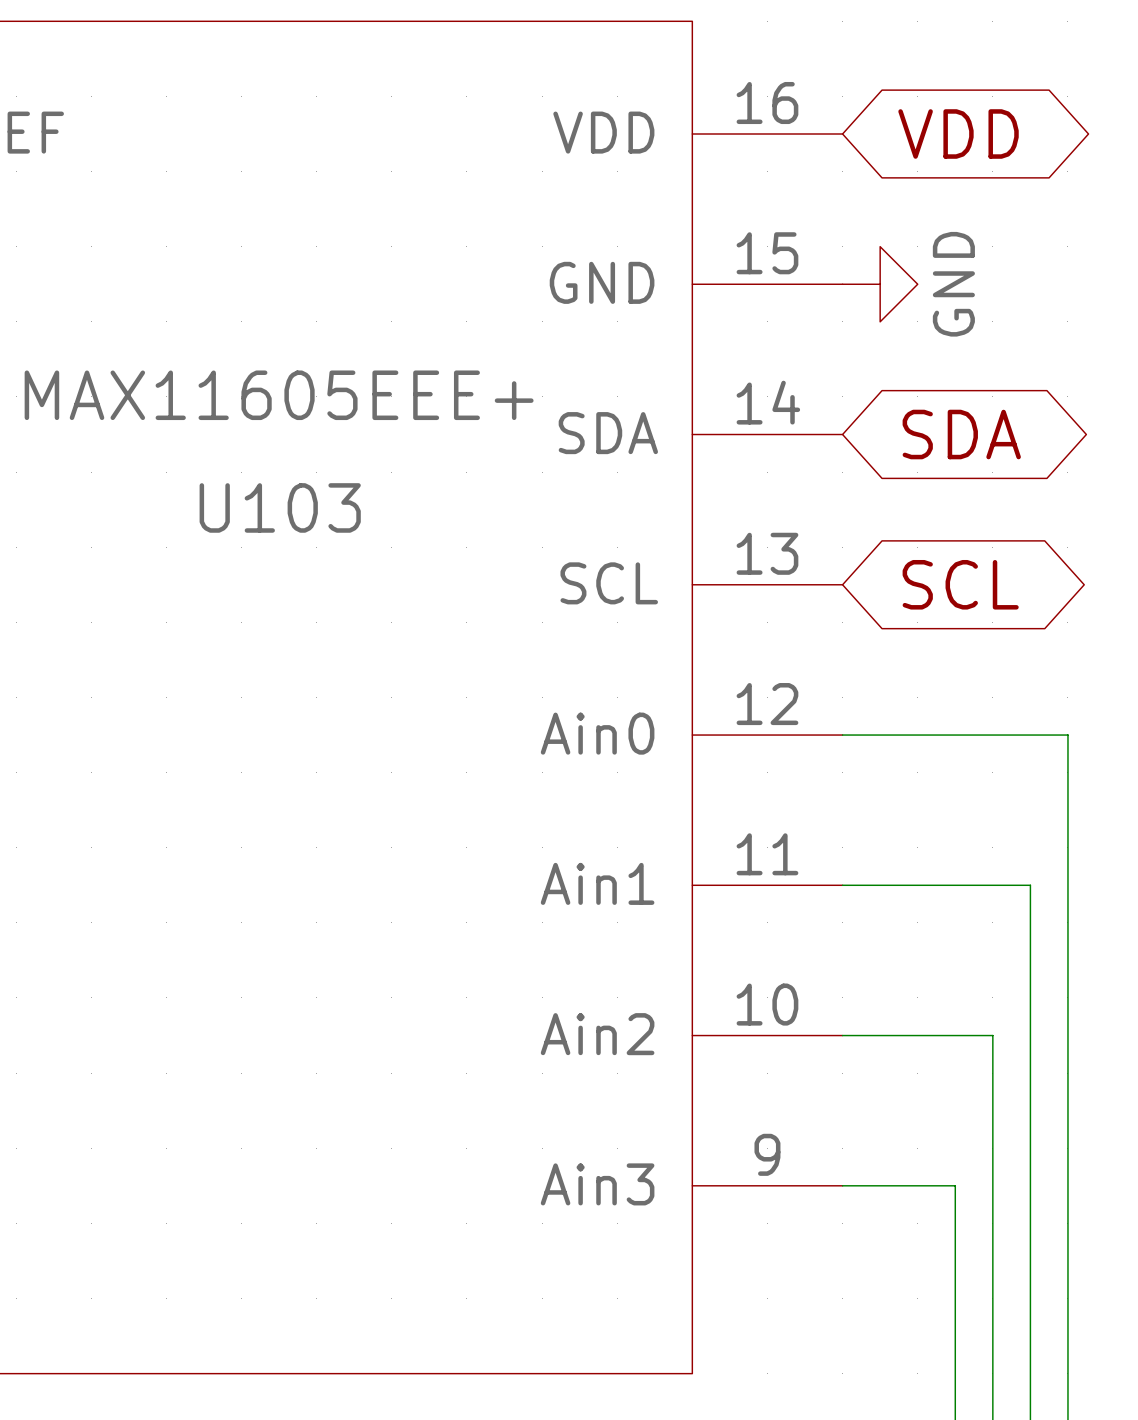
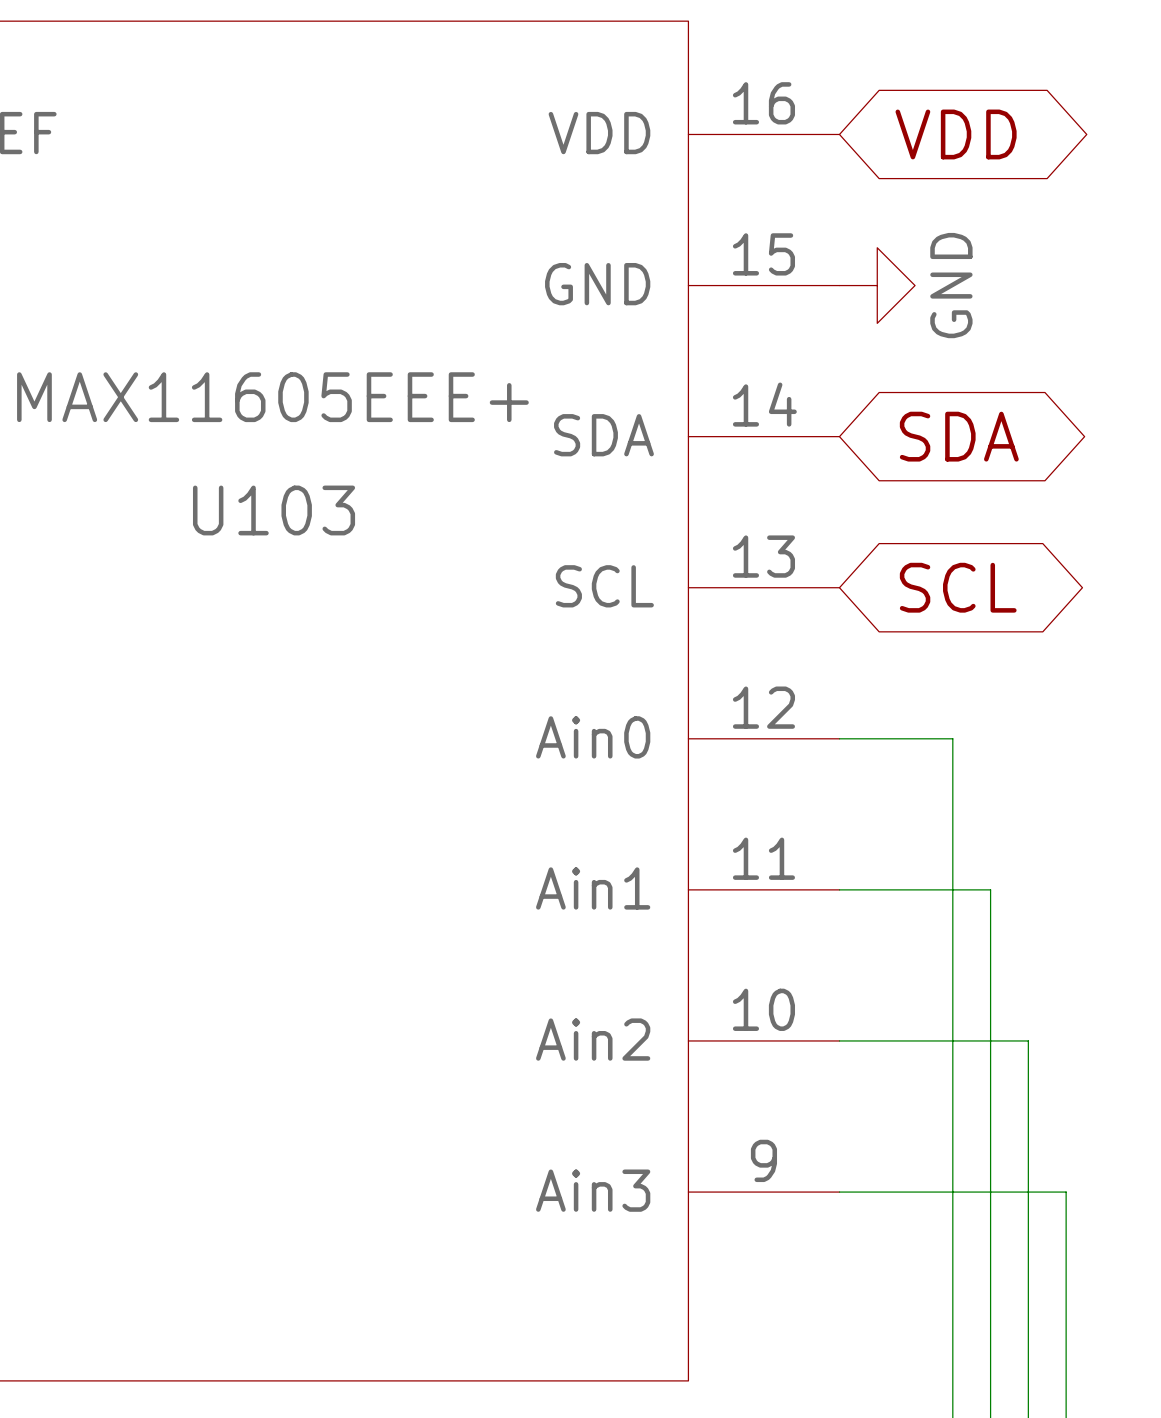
wire: (955, 735) (1067, 735) (1067, 1185) -> (952, 738) (952, 1192) (1066, 1192)
wire: (992, 885) (1030, 885) (1030, 1035) -> (990, 889) (990, 1040) (1028, 1040)

